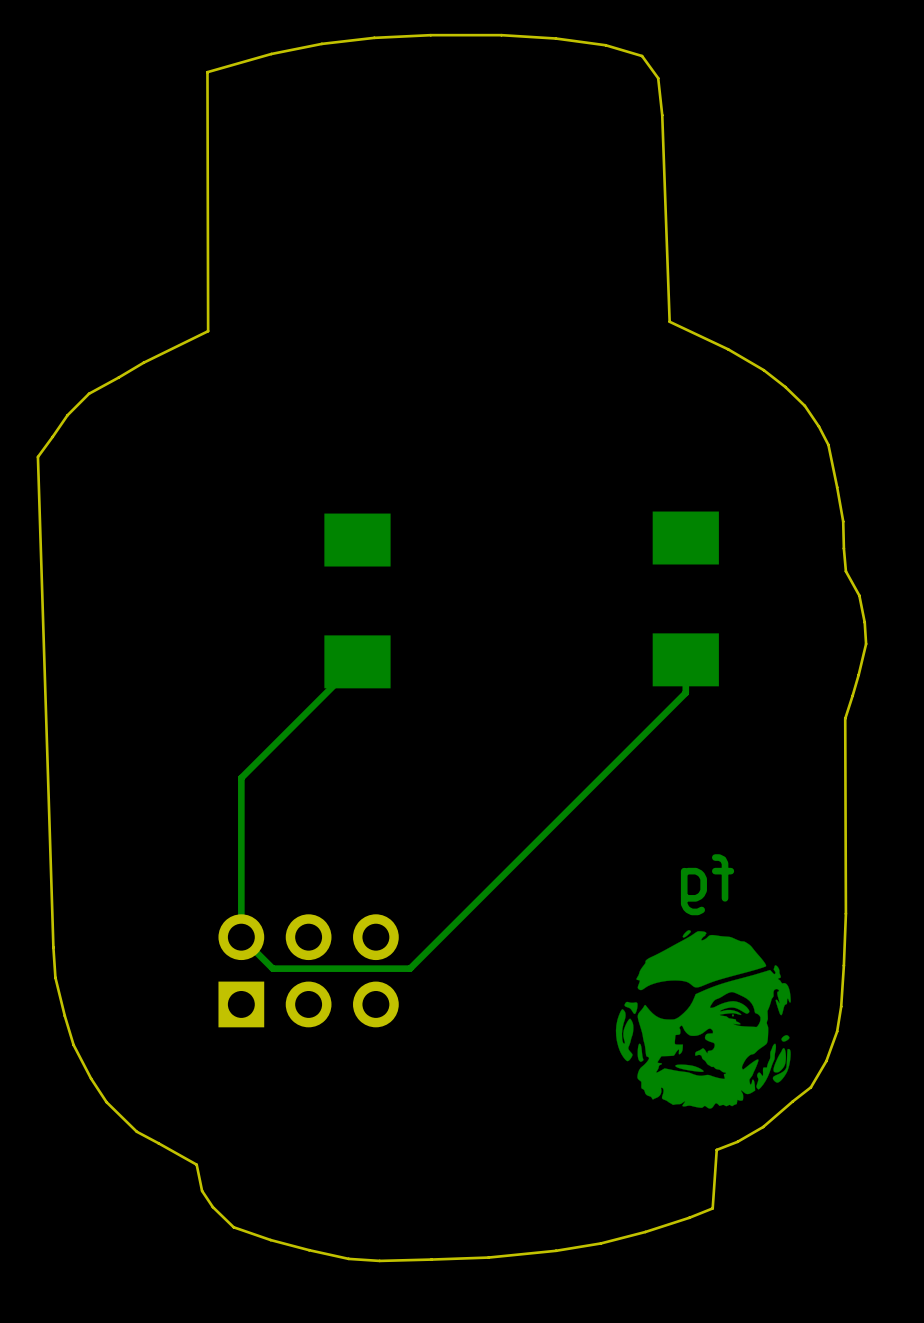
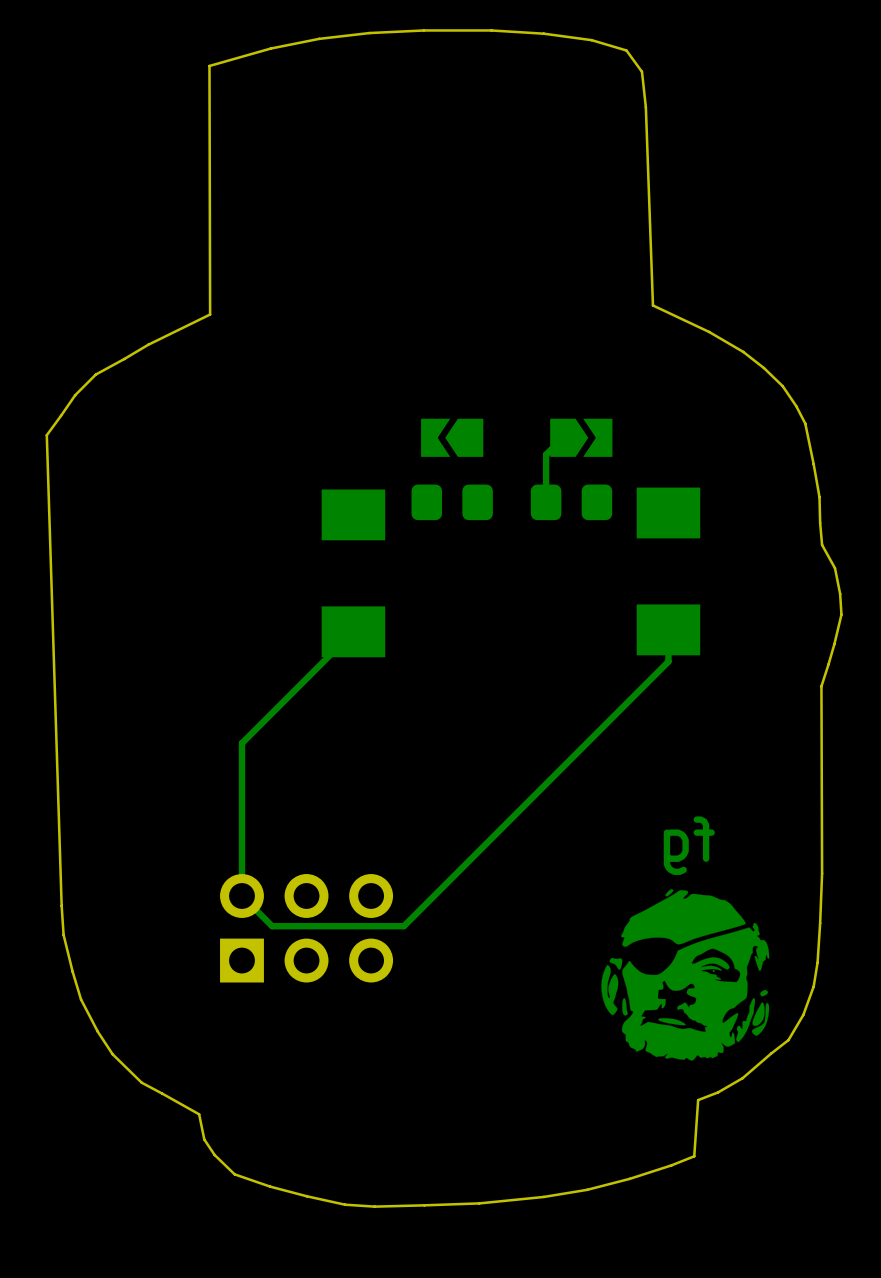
part: none -> (452, 437)
bottom track: none -> (562, 437) (546, 454) (546, 502)
part: none -> (581, 437)
part: none -> (452, 502)
part: none -> (571, 502)

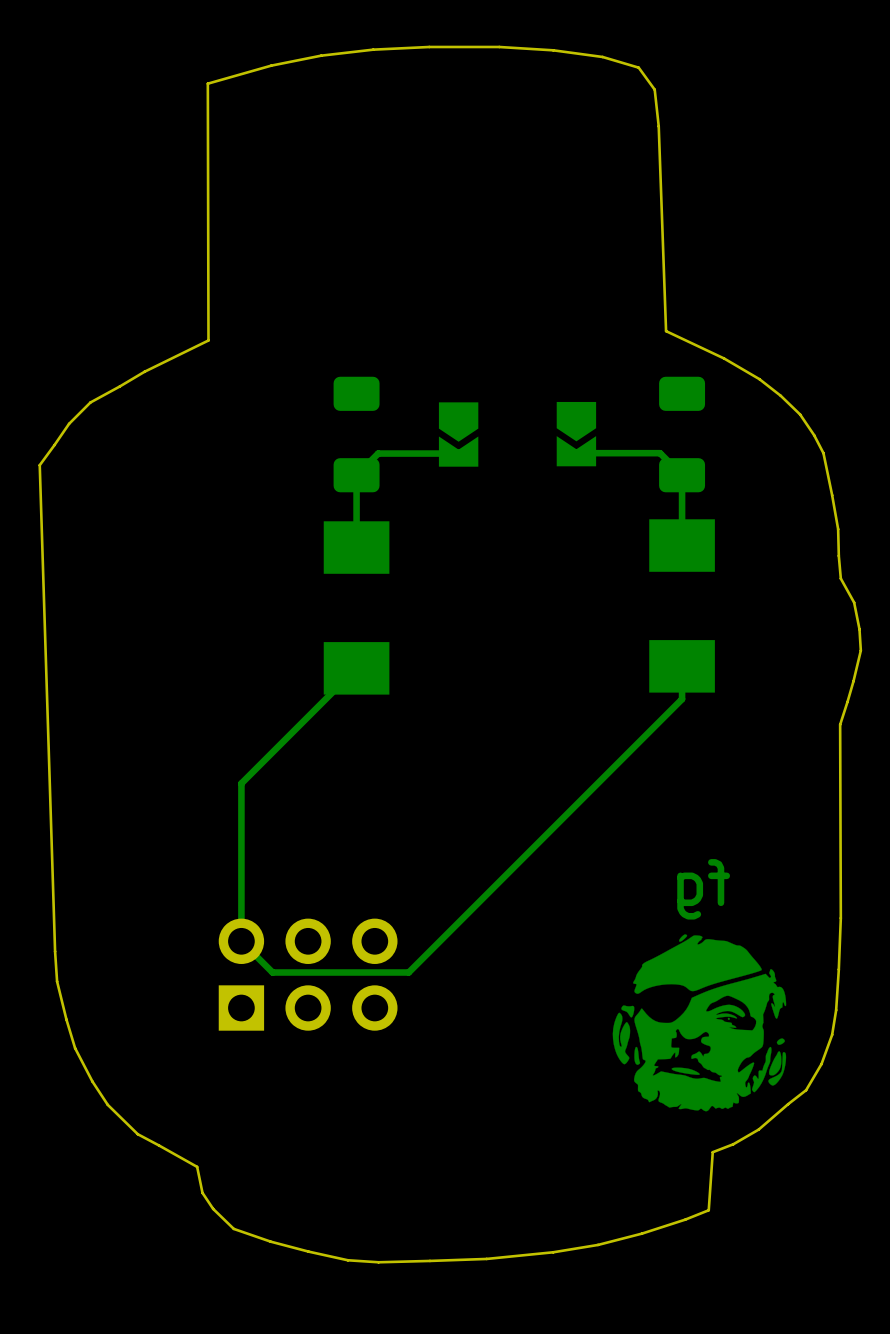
part: none -> (356, 434)
part: none -> (682, 434)
bottom track: none -> (458, 453) (378, 453) (356, 475) (356, 547)
bottom track: none -> (576, 453) (660, 453) (682, 475) (682, 545)
part rotation: 0° (452, 437) -> 90° counterclockwise (458, 434)
bottom track: (562, 437) (546, 454) (546, 502) -> none
part rotation: 0° (581, 437) -> 90° clockwise (576, 434)
part: (452, 502) -> none
part: (571, 502) -> none

